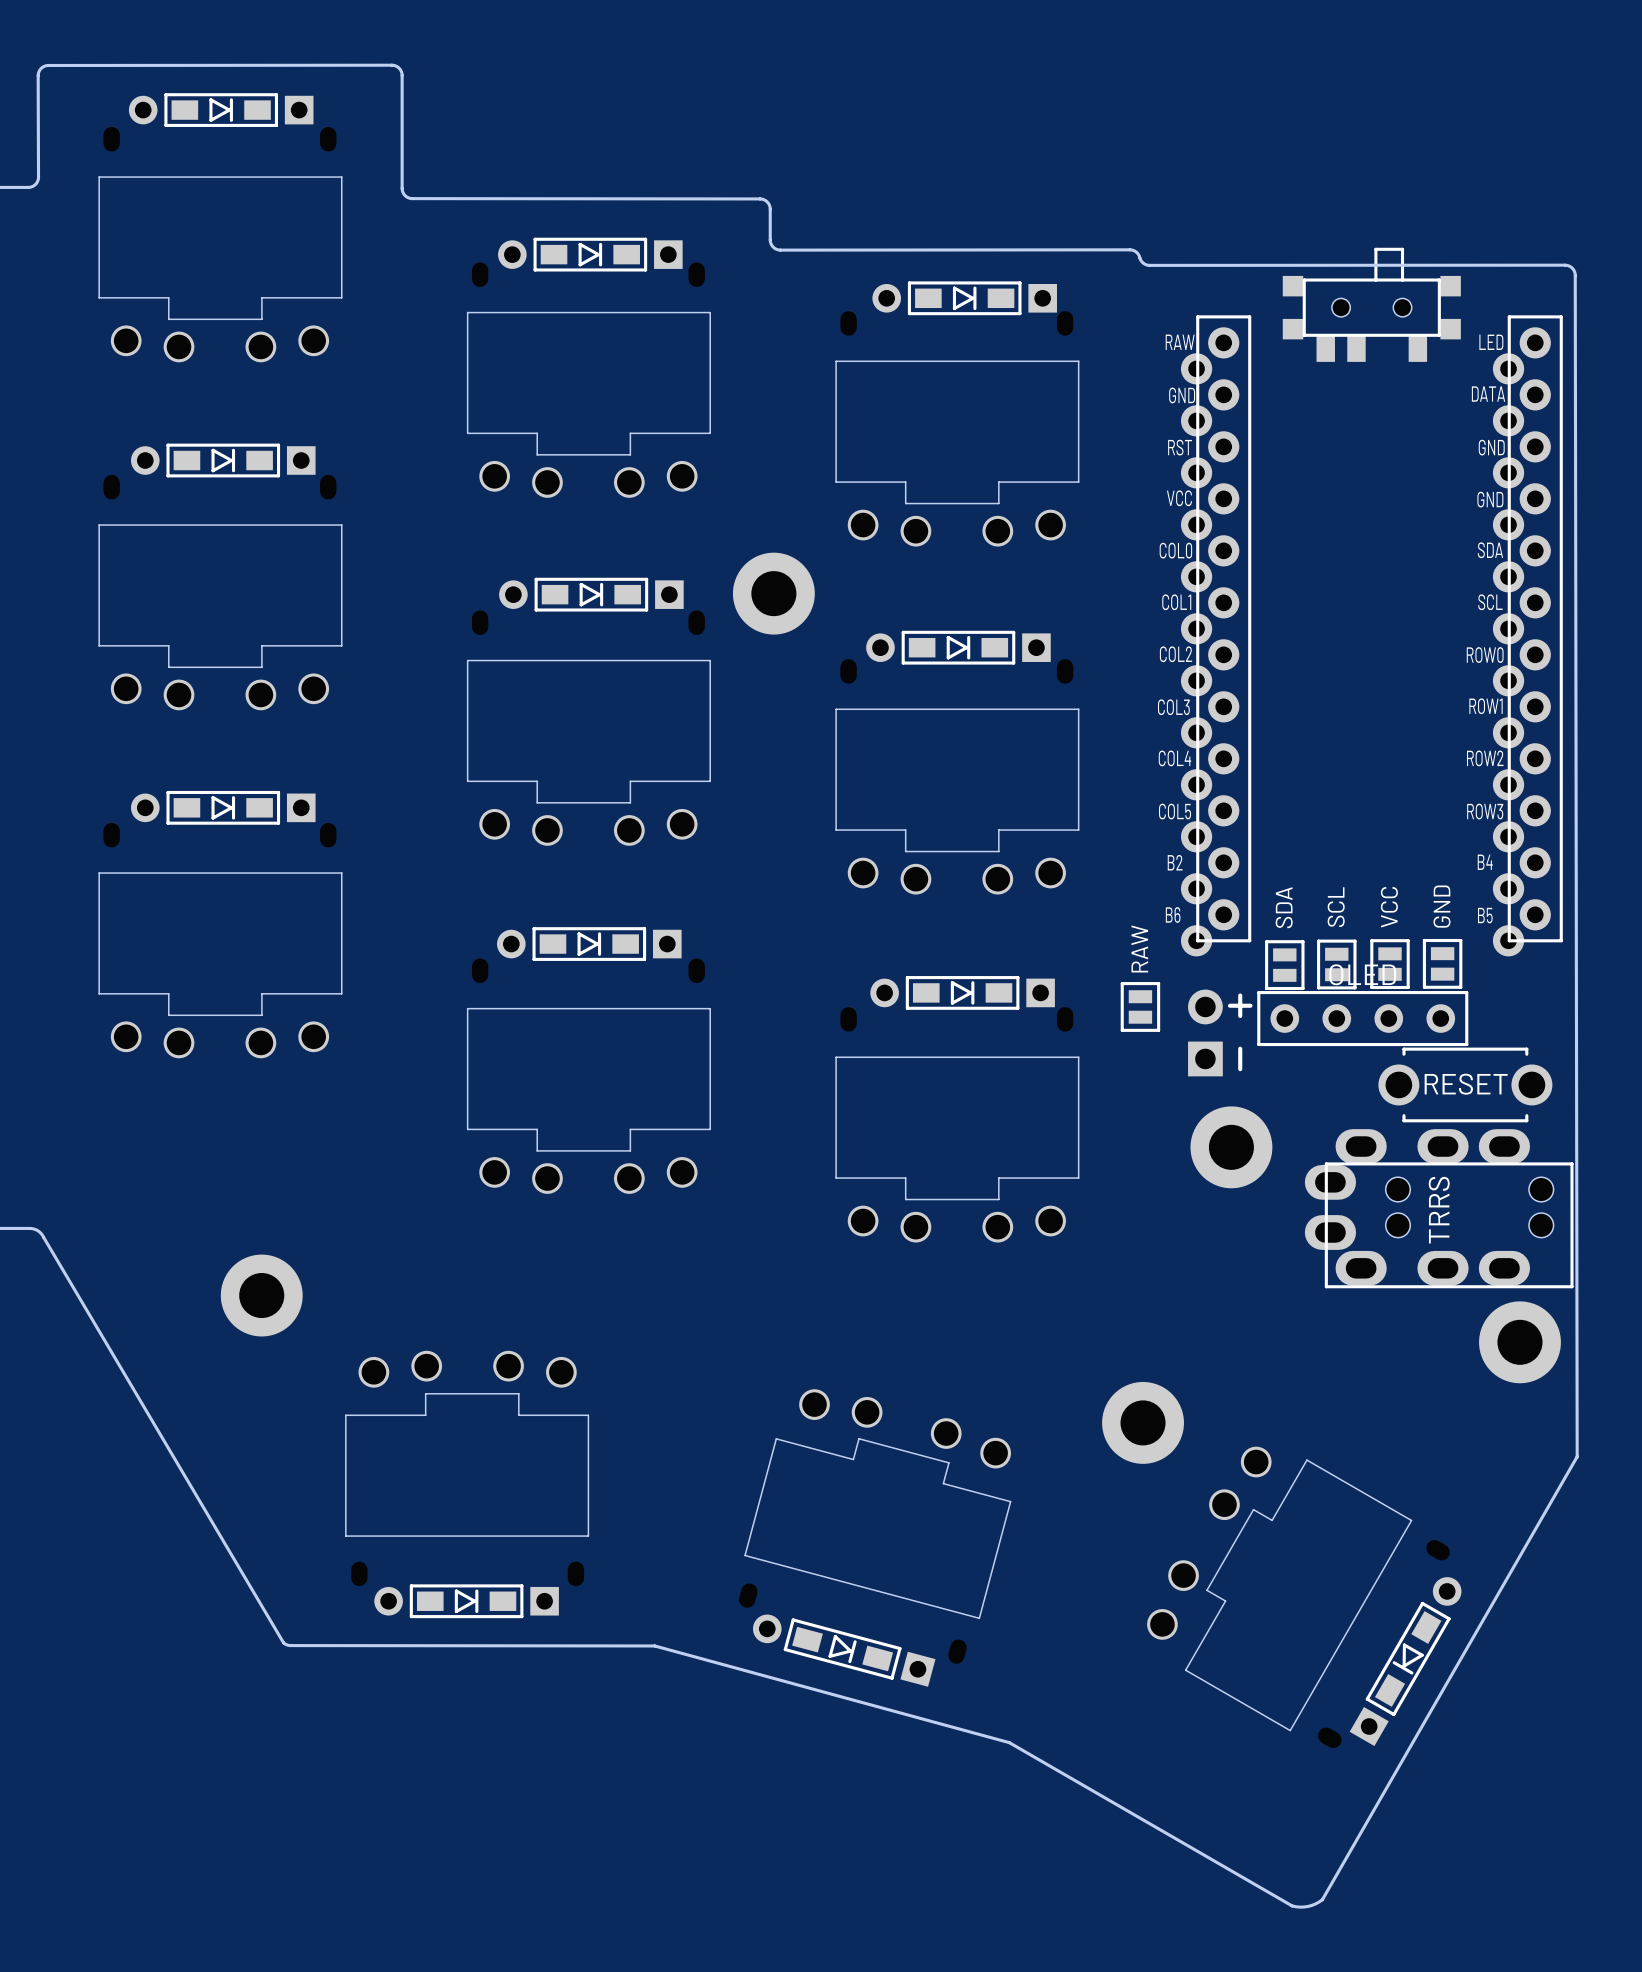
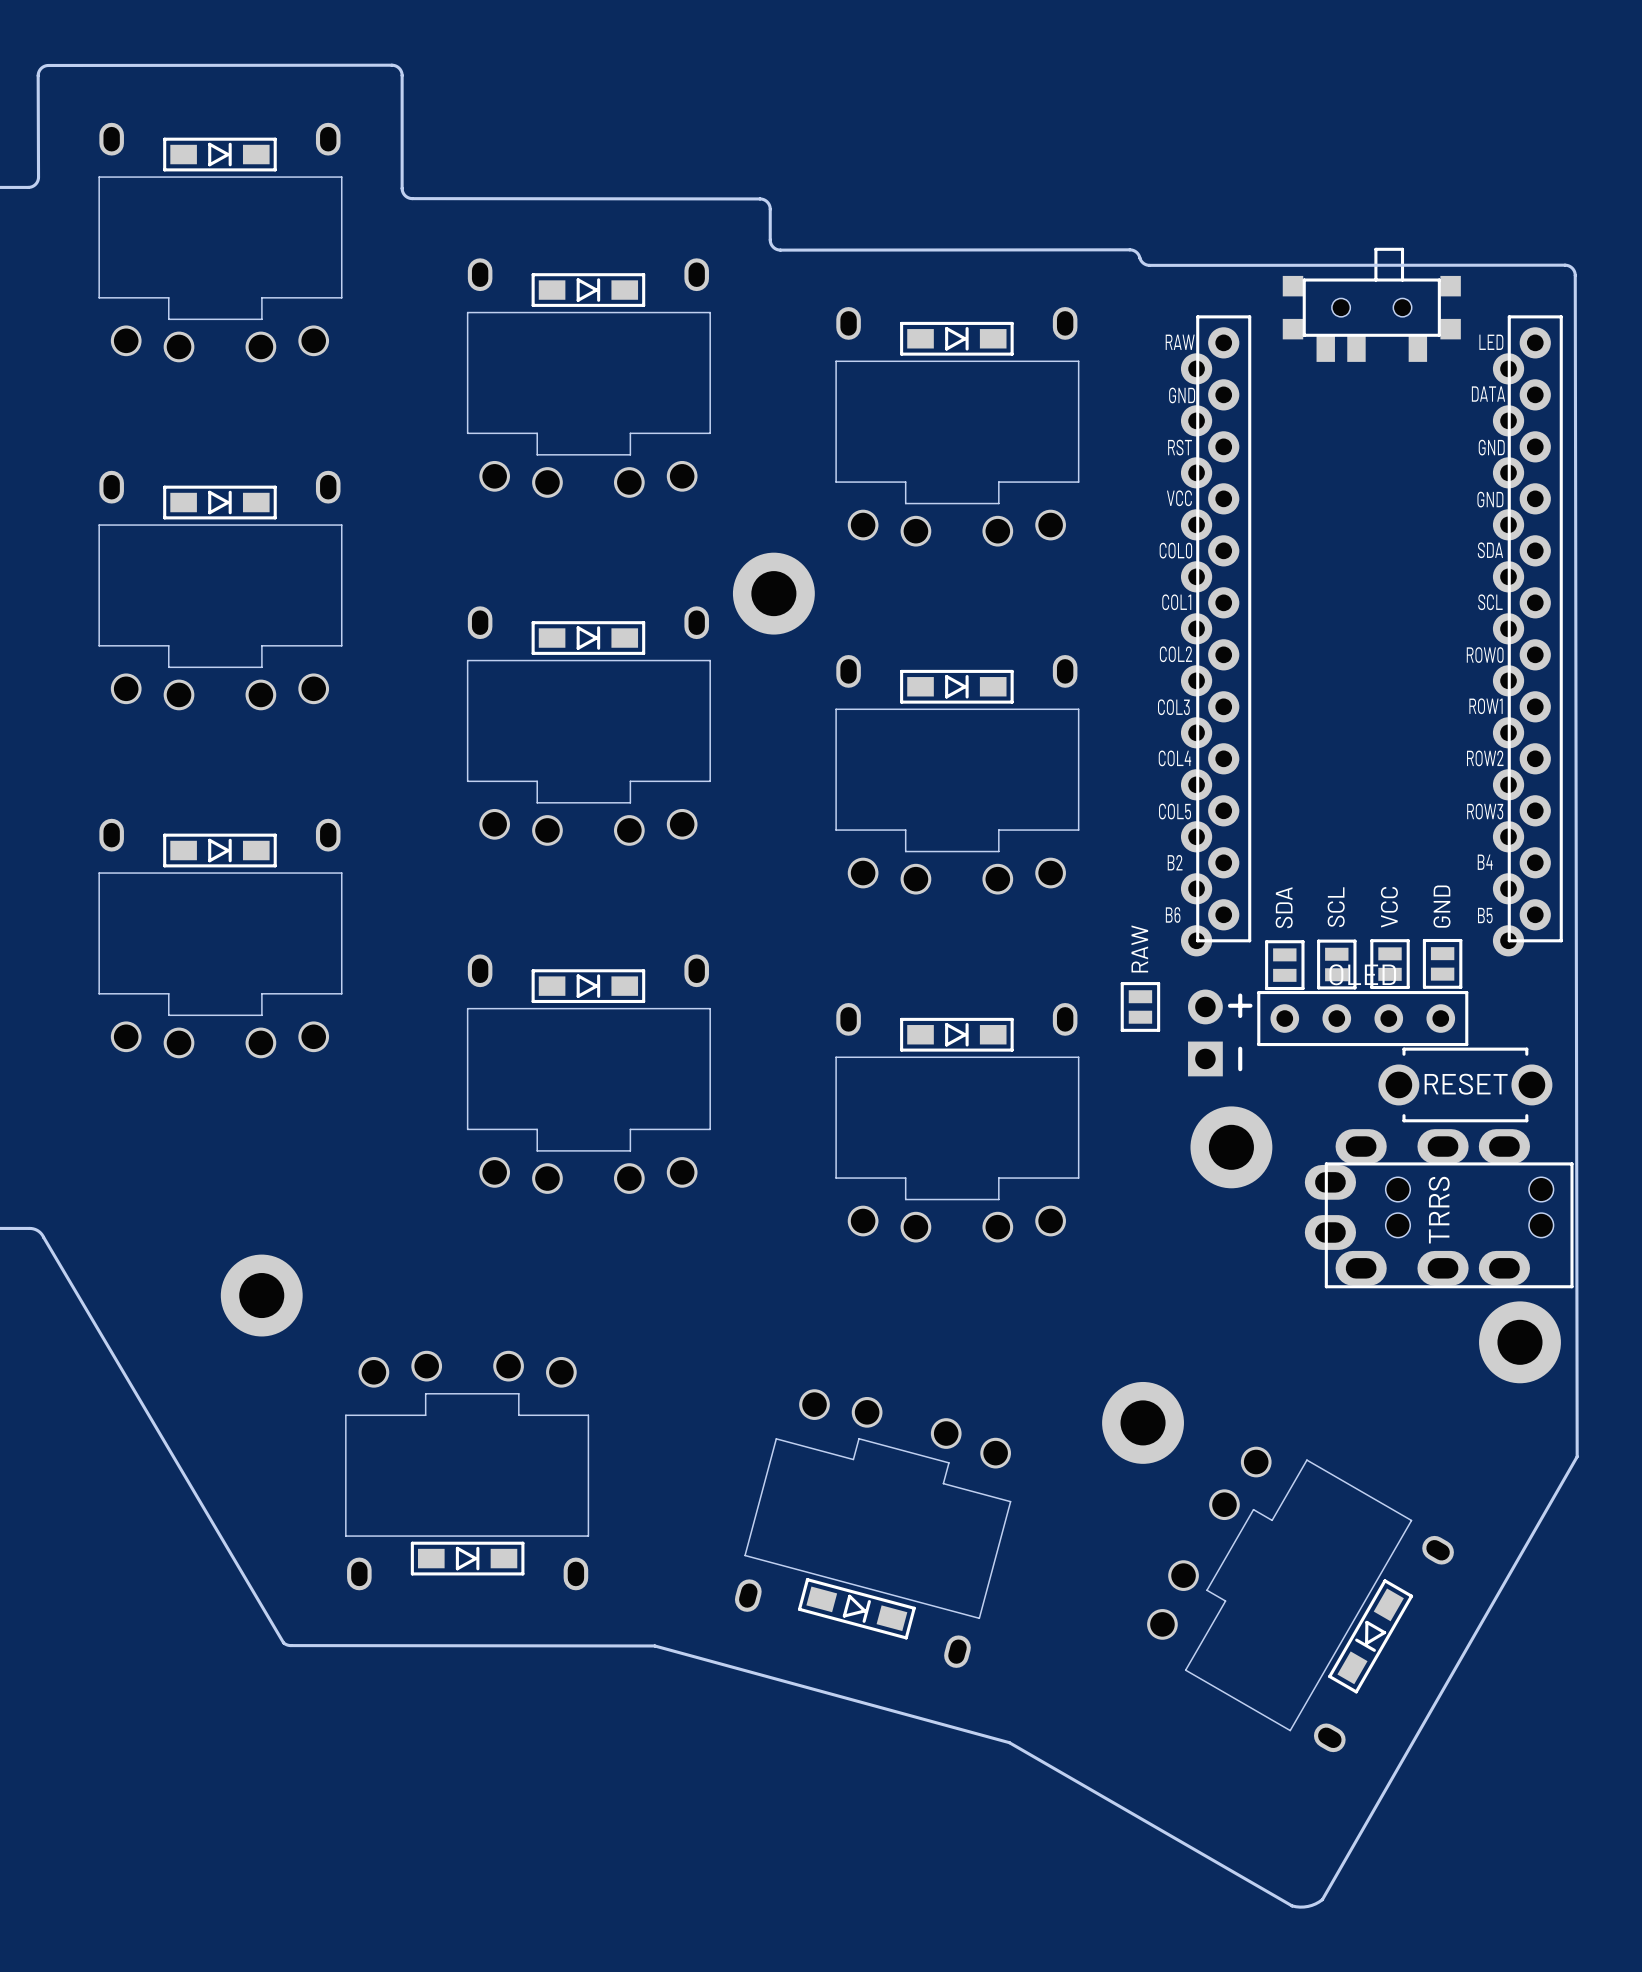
part: (221, 110) -> none
part footprint: [98, 126, 343, 363] -> [98, 122, 343, 363]
part: none -> (219, 154)
part: (590, 254) -> none
part footprint: [467, 262, 711, 498] -> [467, 258, 711, 498]
part: none -> (588, 290)
part: (964, 298) -> none
part footprint: [835, 311, 1080, 547] -> [835, 307, 1080, 547]
part: none -> (956, 338)
part: (223, 460) -> none
part footprint: [98, 474, 343, 711] -> [98, 470, 343, 711]
part: none -> (219, 502)
part: (591, 594) -> none
part footprint: [467, 610, 711, 846] -> [467, 606, 711, 846]
part: none -> (588, 638)
part: (958, 647) -> none
part footprint: [835, 659, 1080, 895] -> [835, 655, 1080, 895]
part: none -> (956, 686)
part: (223, 807) -> none
part footprint: [98, 822, 343, 1059] -> [98, 818, 343, 1059]
part: none -> (219, 850)
part: (589, 944) -> none
part footprint: [467, 958, 711, 1194] -> [467, 954, 711, 1194]
part: none -> (588, 986)
part: (962, 992) -> none
part footprint: [835, 1007, 1080, 1243] -> [835, 1003, 1080, 1243]
part: none -> (956, 1034)
part footprint: [345, 1350, 589, 1587] -> [345, 1350, 589, 1591]
part footprint: [739, 1389, 1012, 1664] -> [734, 1389, 1012, 1668]
part footprint: [1147, 1446, 1450, 1749] -> [1147, 1446, 1454, 1753]
part: none -> (467, 1558)
part: (466, 1601) -> none
part: none -> (856, 1608)
part: none -> (1370, 1636)
part: (844, 1650) -> none
part: (1405, 1661) -> none

